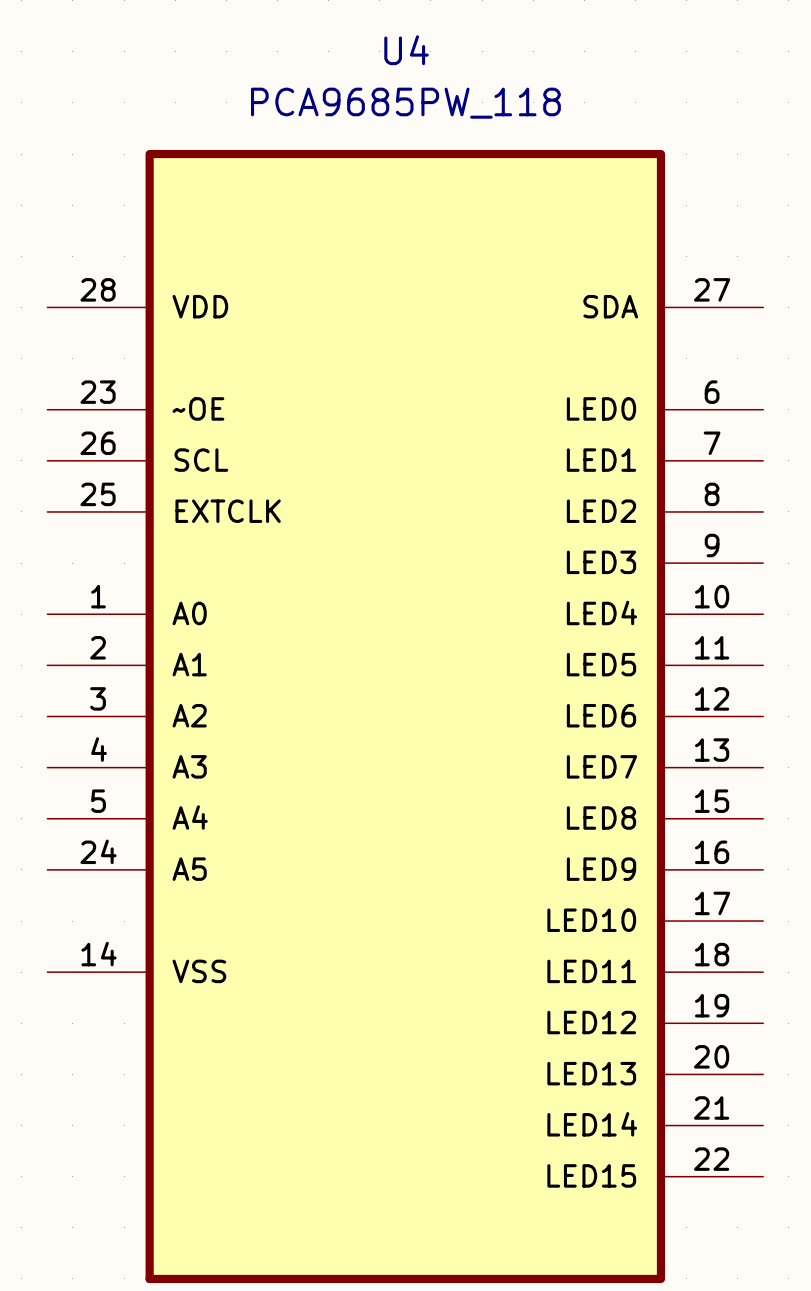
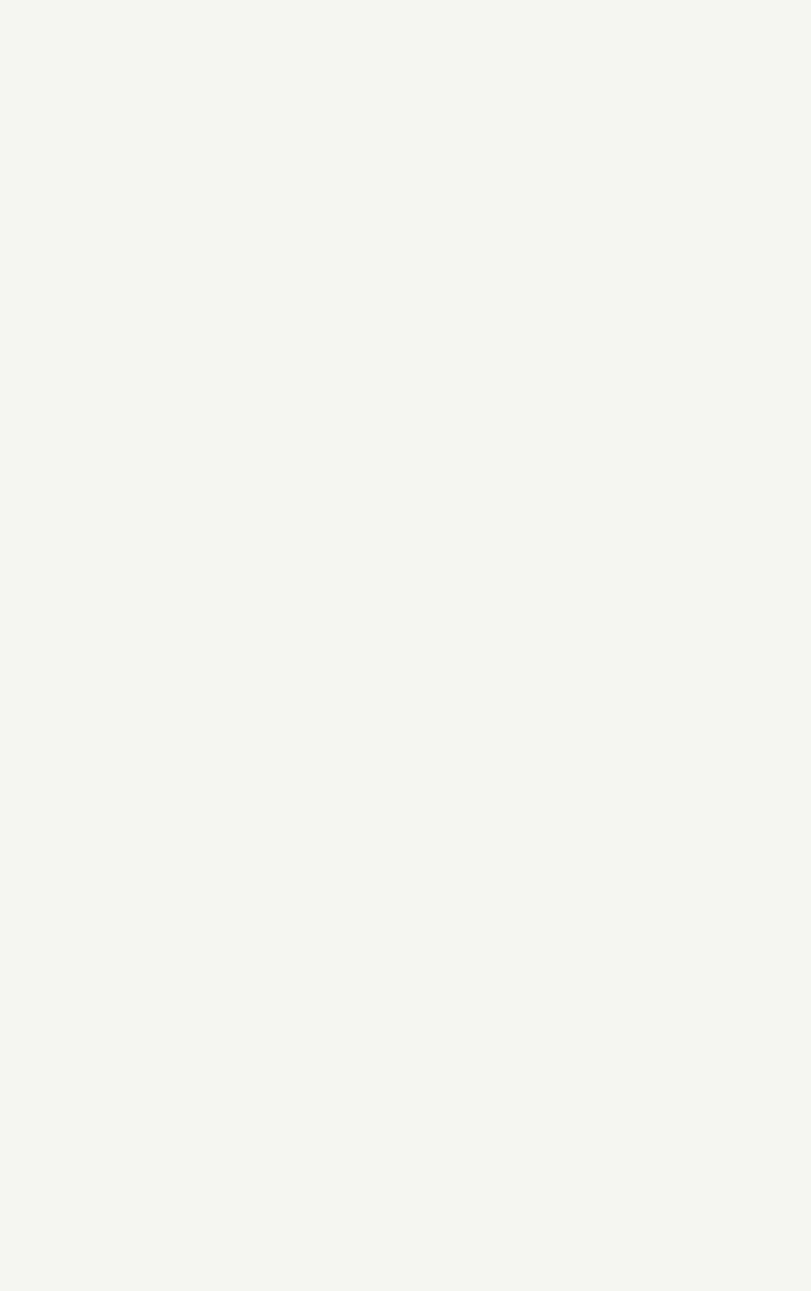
U4: PCA9685PW_118 (405, 716) -> none

